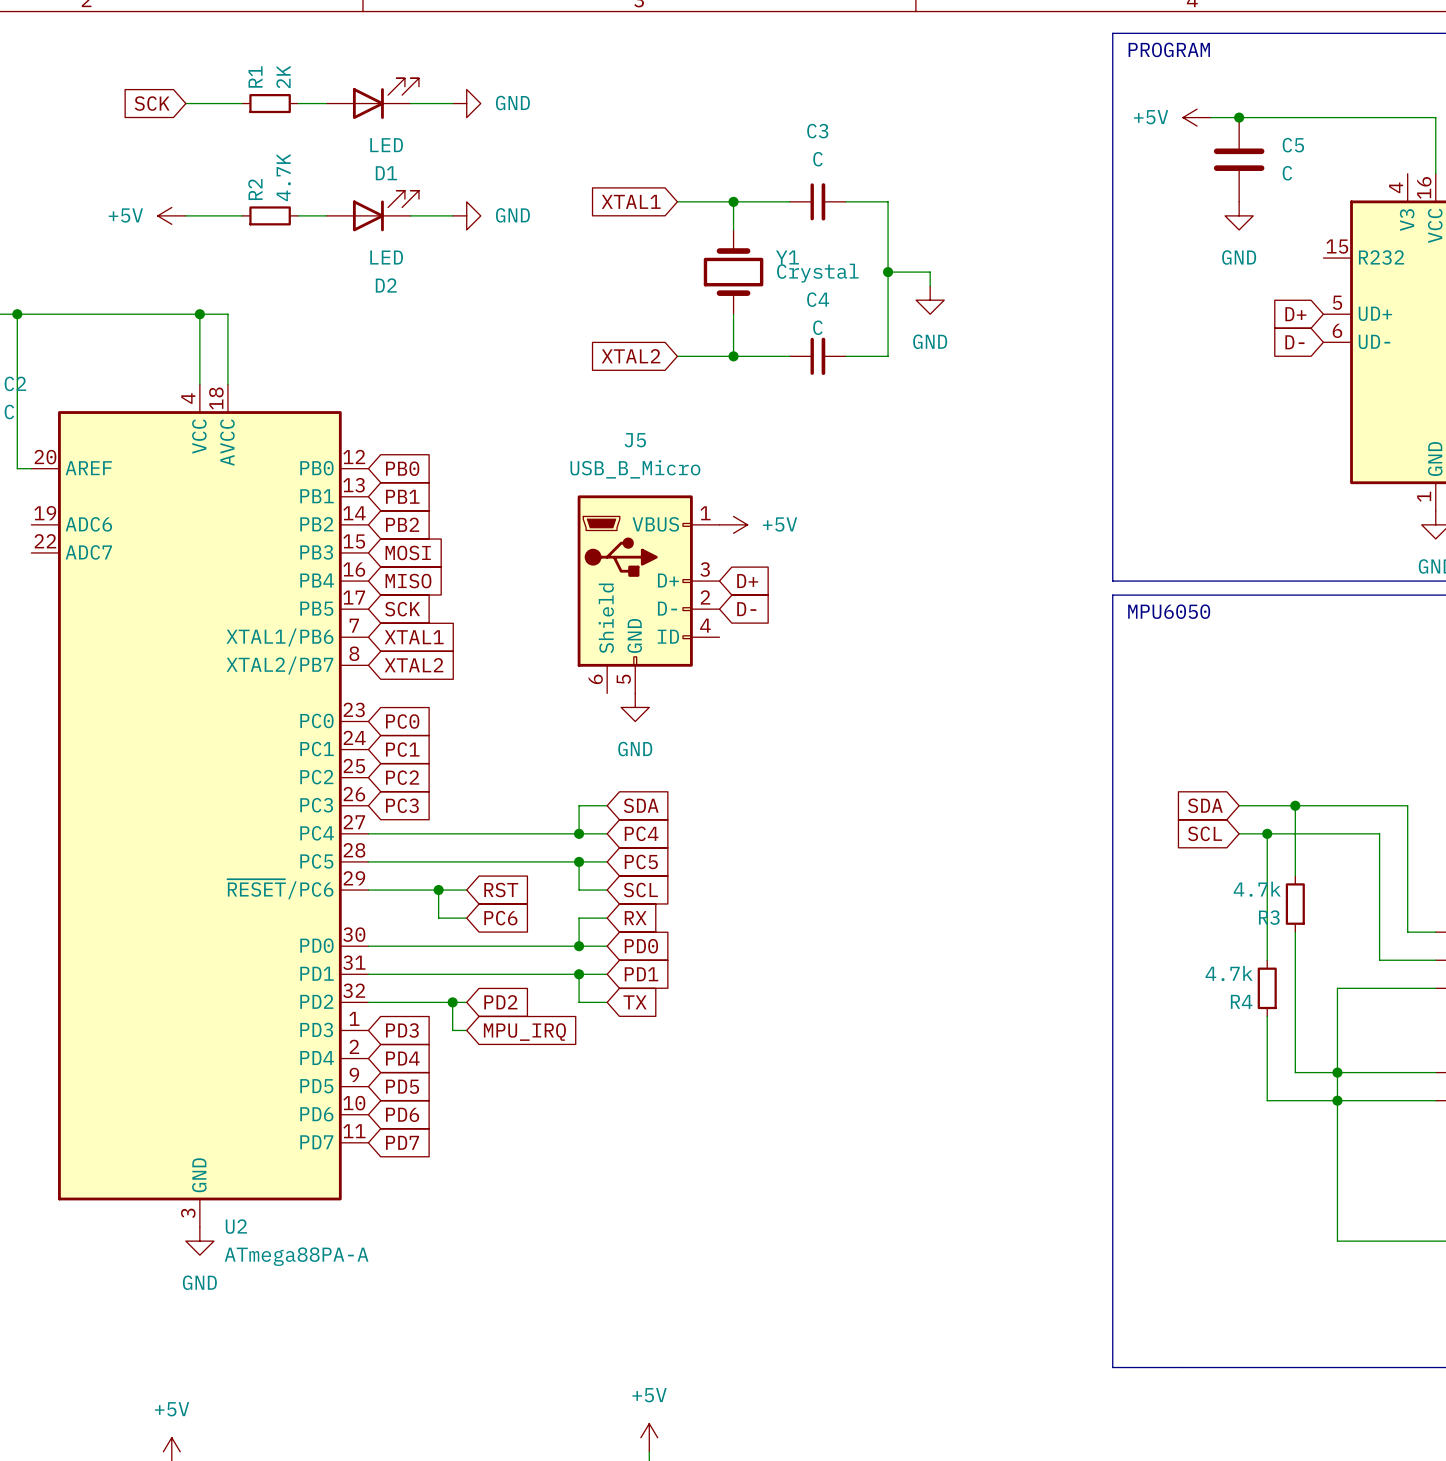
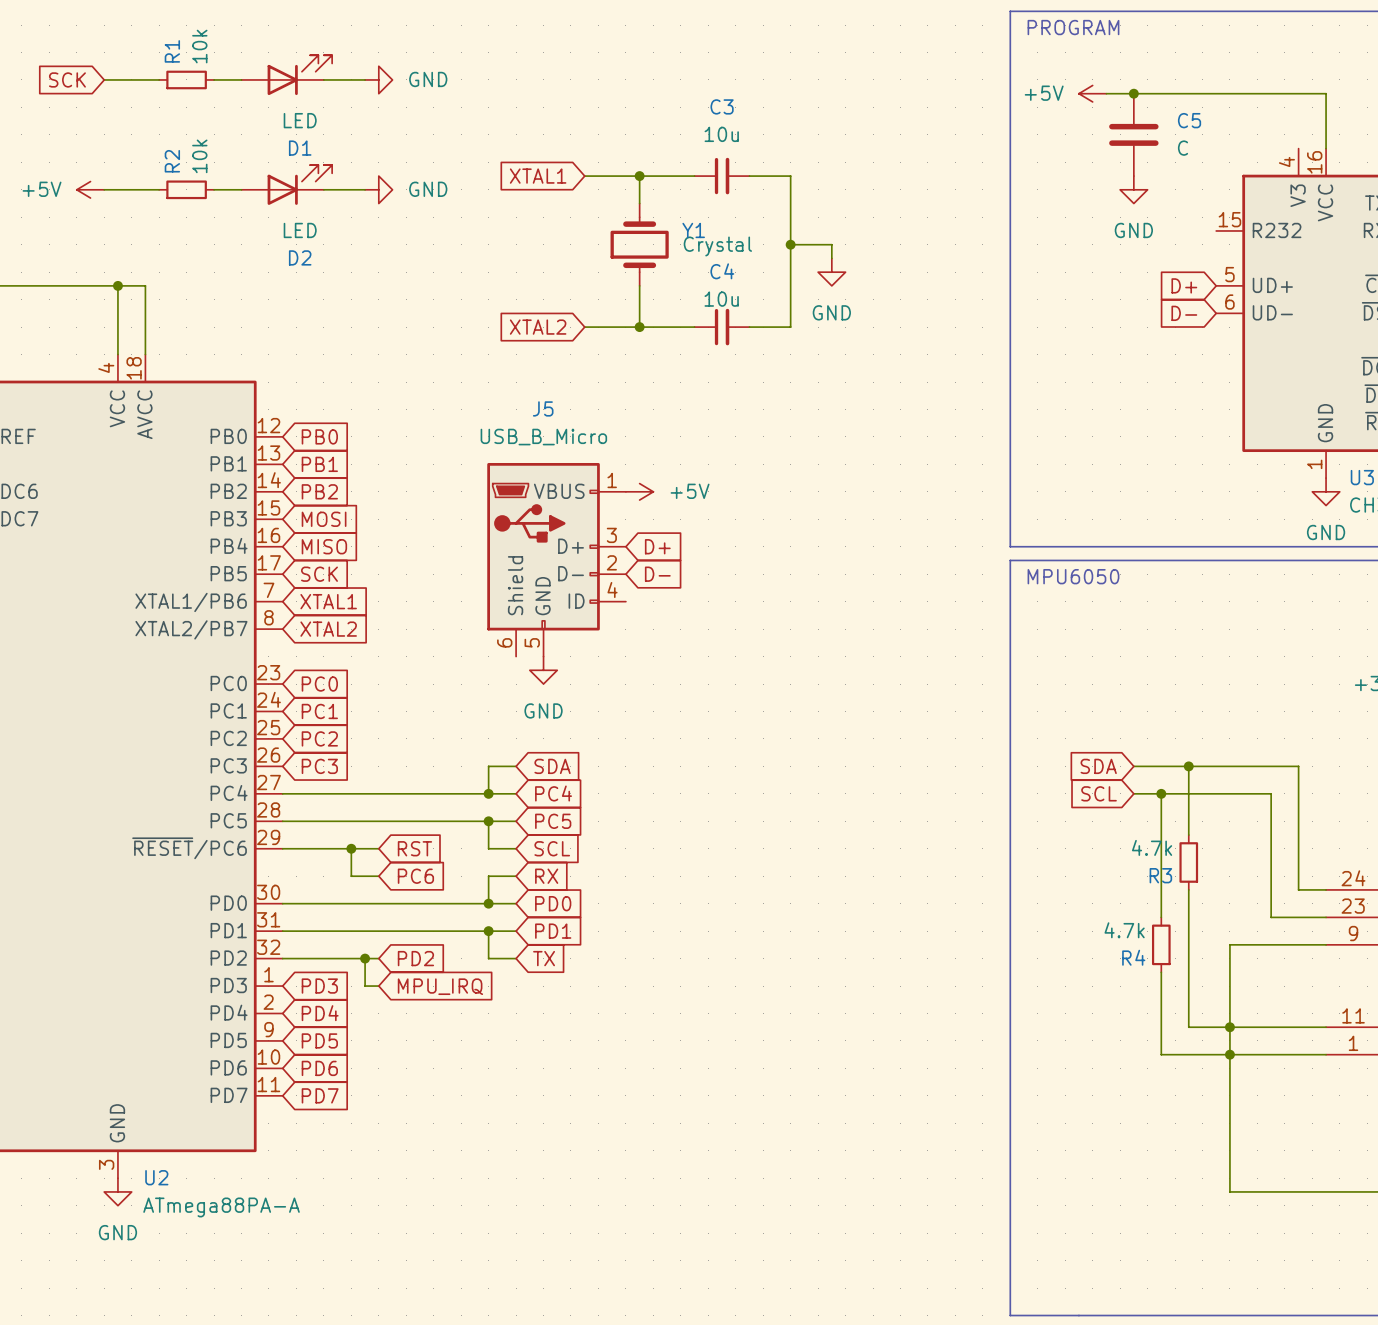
R1 value: 2K (283, 77) -> 10k (199, 46)
C3 value: C (817, 159) -> 10u (721, 134)
R2 value: 4.7K (283, 177) -> 10k (199, 156)
C4 value: C (817, 327) -> 10u (721, 299)

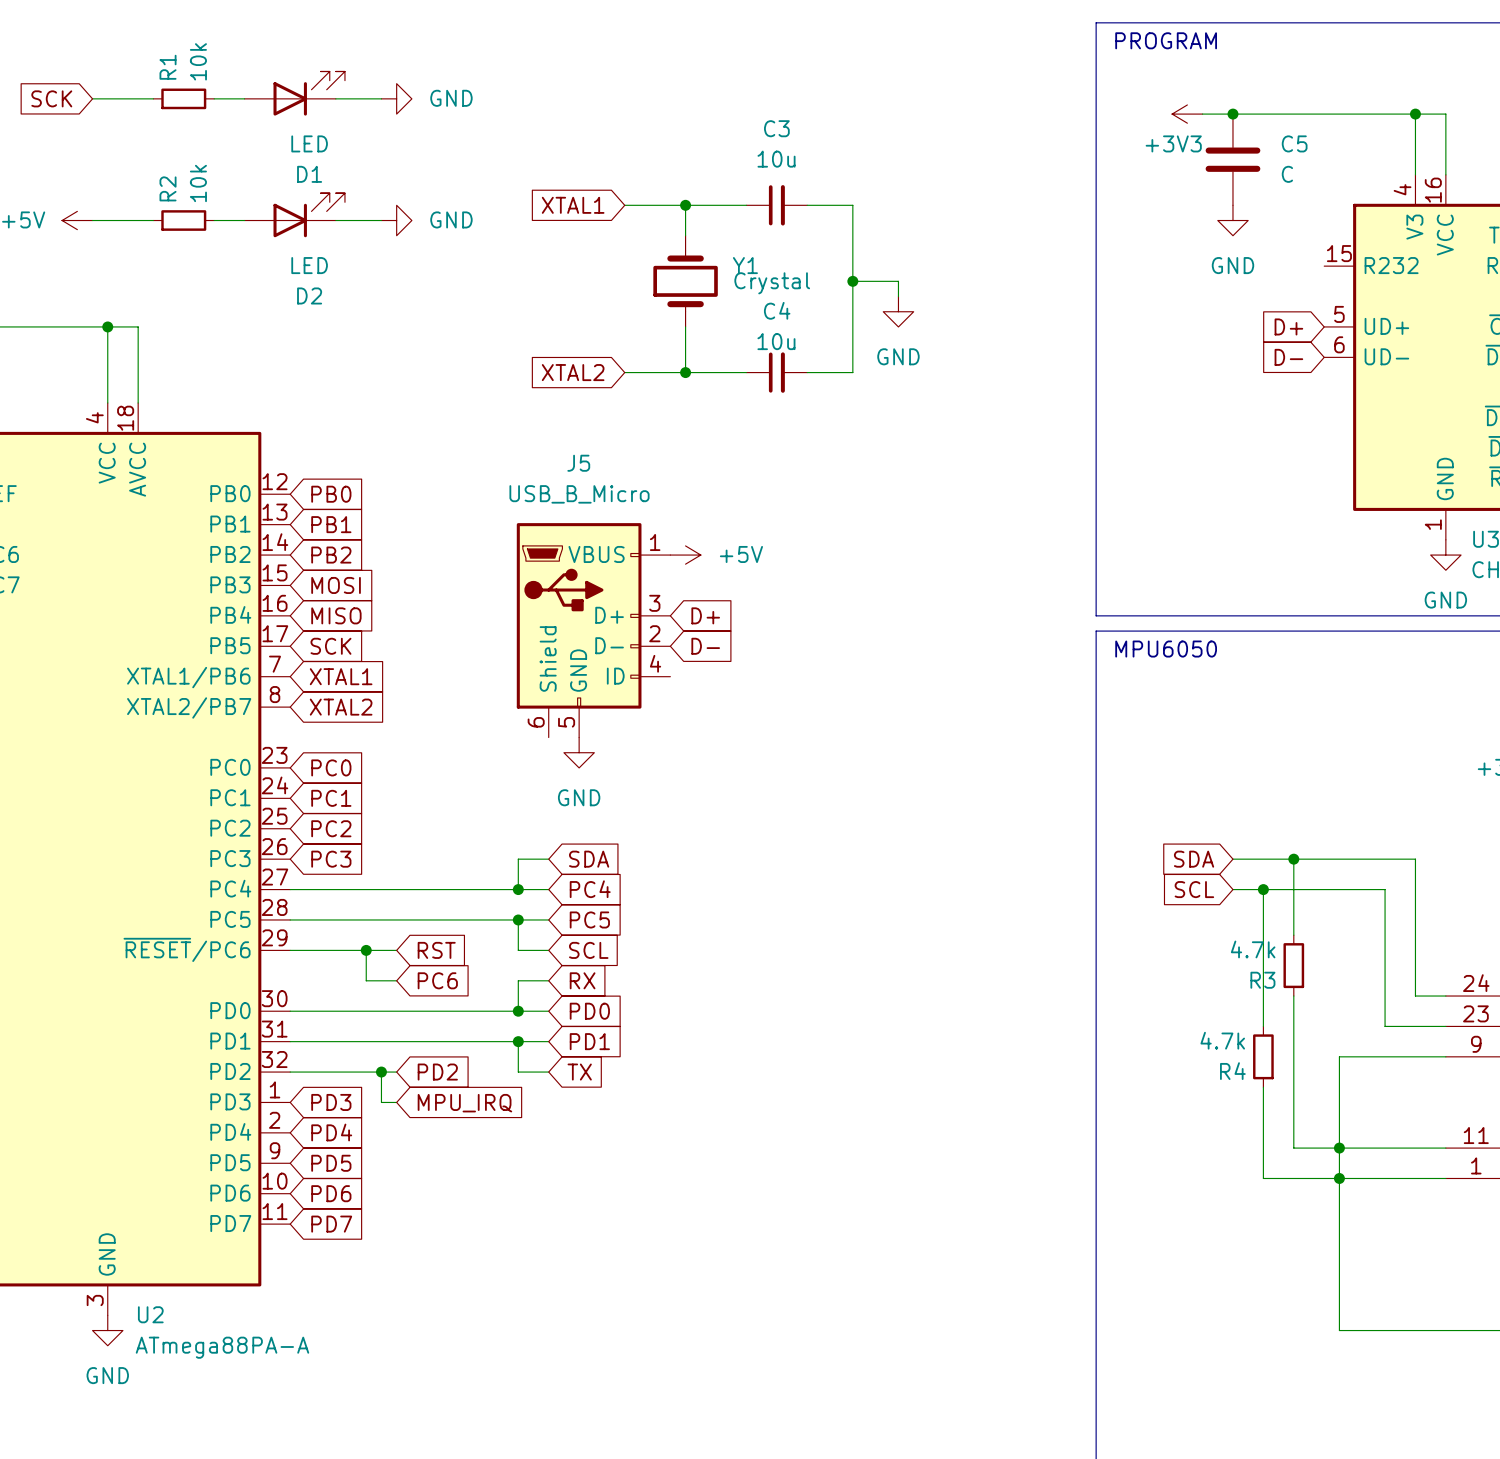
power symbol: +5V (1092, 93) -> +3V3 (1187, 114)
wire: none -> (1415, 114) (1415, 174)
junction: none -> (1415, 114)

